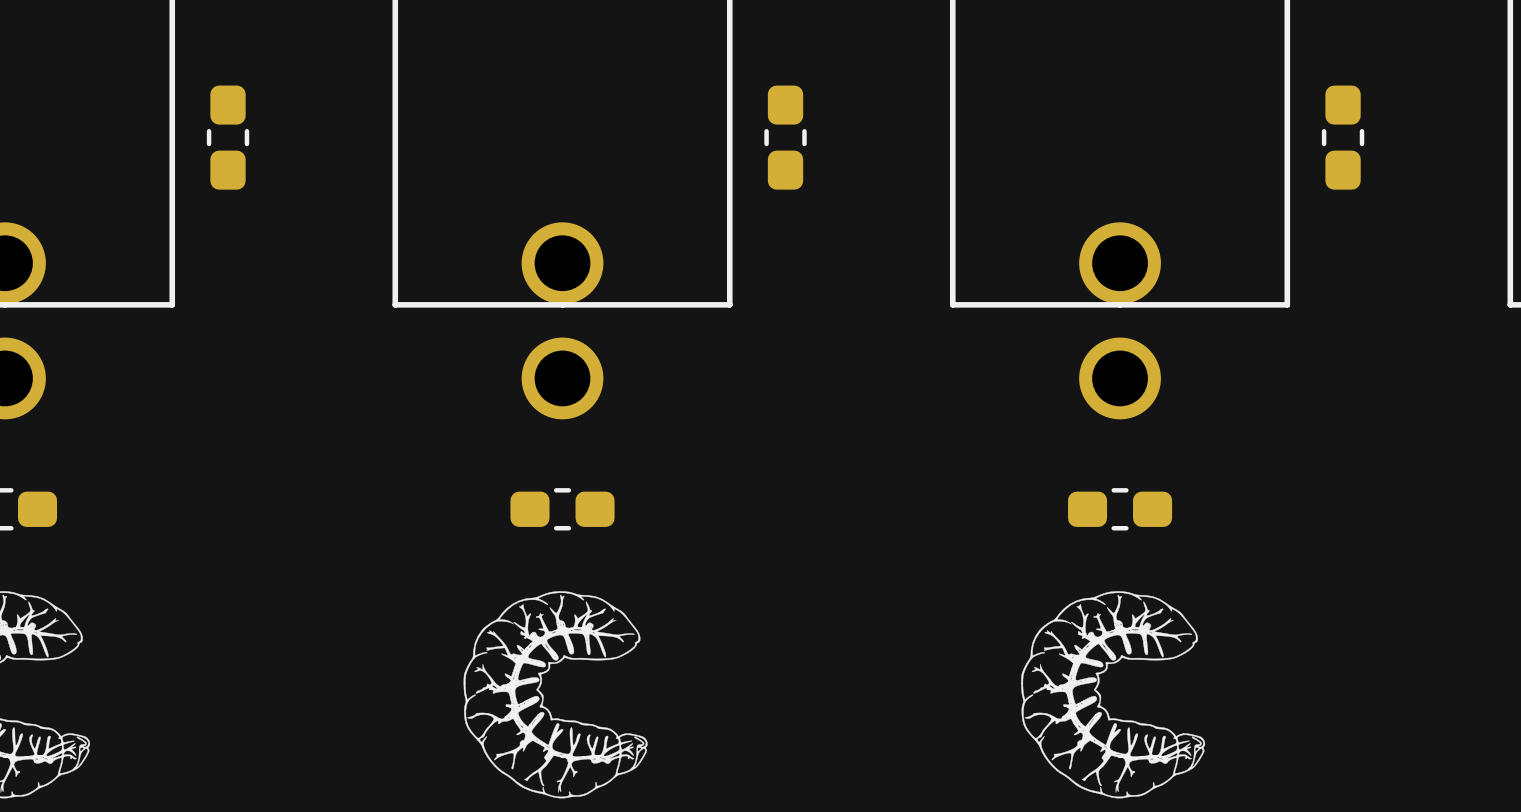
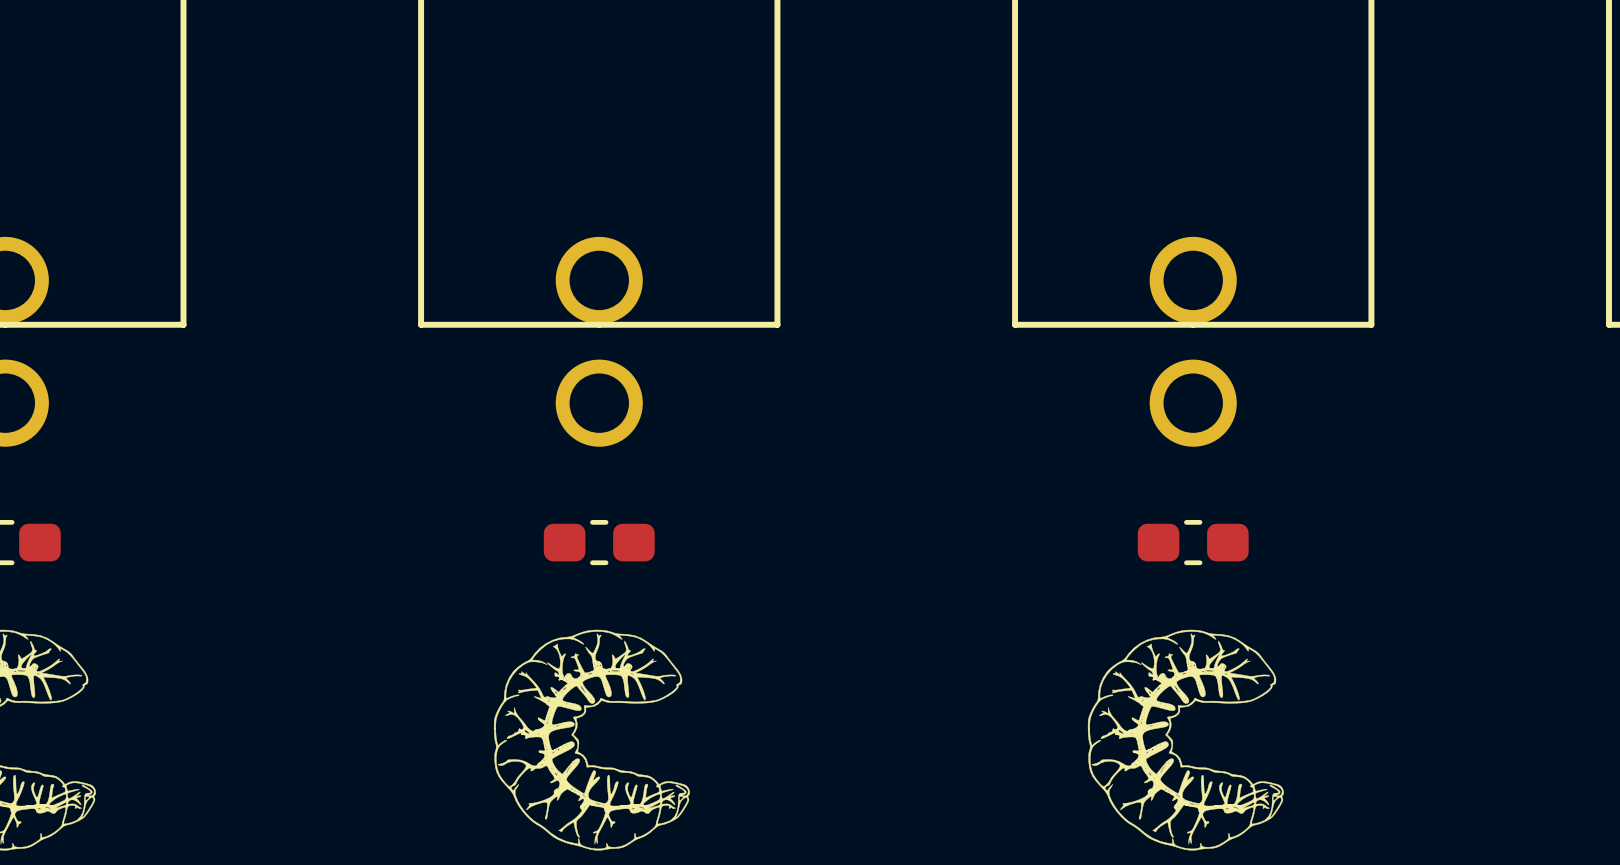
part: (228, 137) -> none
part: (785, 137) -> none
part: (1343, 137) -> none

